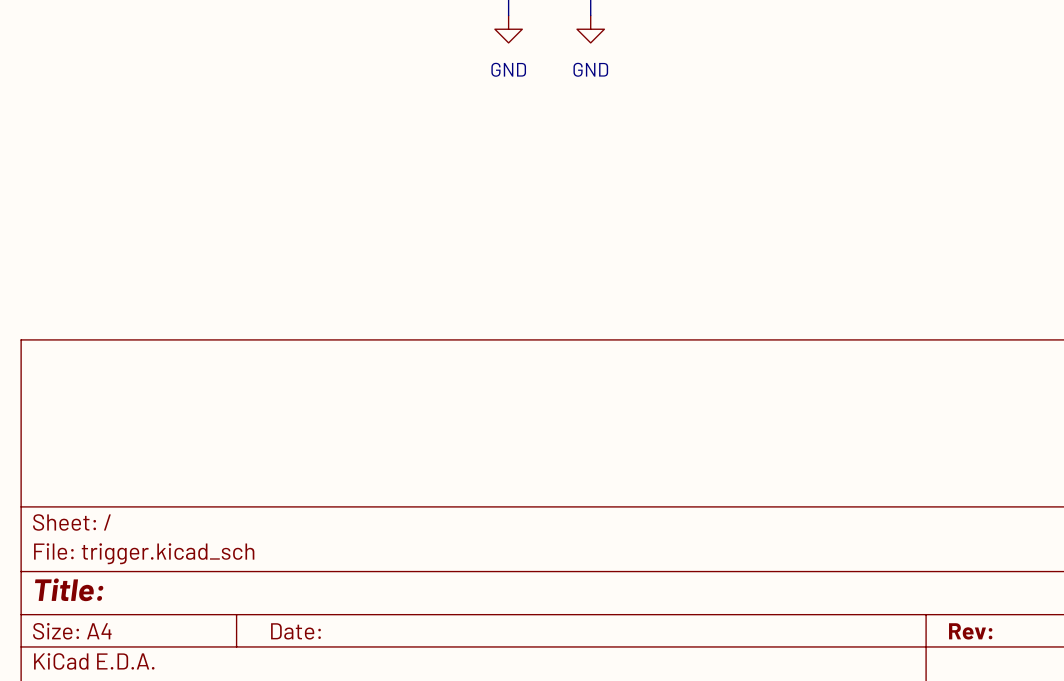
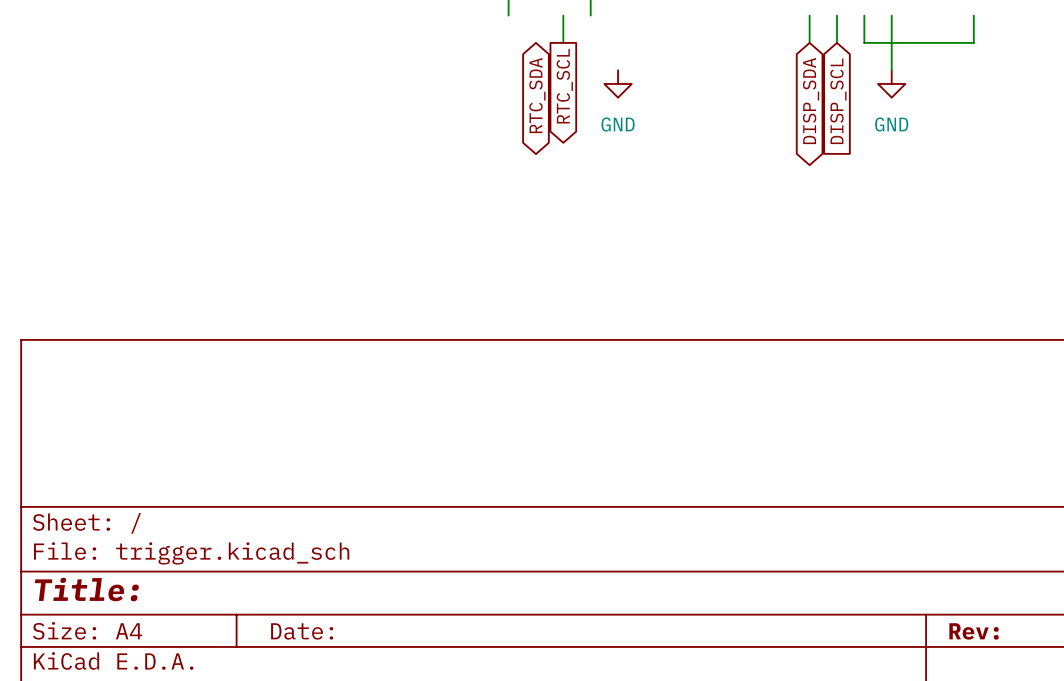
wire: none -> (563, 15) (563, 42)
wire: none -> (809, 15) (809, 42)
wire: none -> (836, 15) (836, 42)
wire: none -> (864, 15) (864, 42) (973, 42) (973, 15)
wire: none -> (891, 15) (891, 70)
power symbol: GND (508, 29) -> none
power symbol: GND (590, 29) -> none
power symbol: none -> GND (618, 83)
power symbol: none -> GND (891, 83)
global label: none -> RTC_SCL (564, 86)
global label: none -> RTC_SDA (537, 95)
global label: none -> DISP_SDA (811, 101)
global label: none -> DISP_SCL (838, 101)

